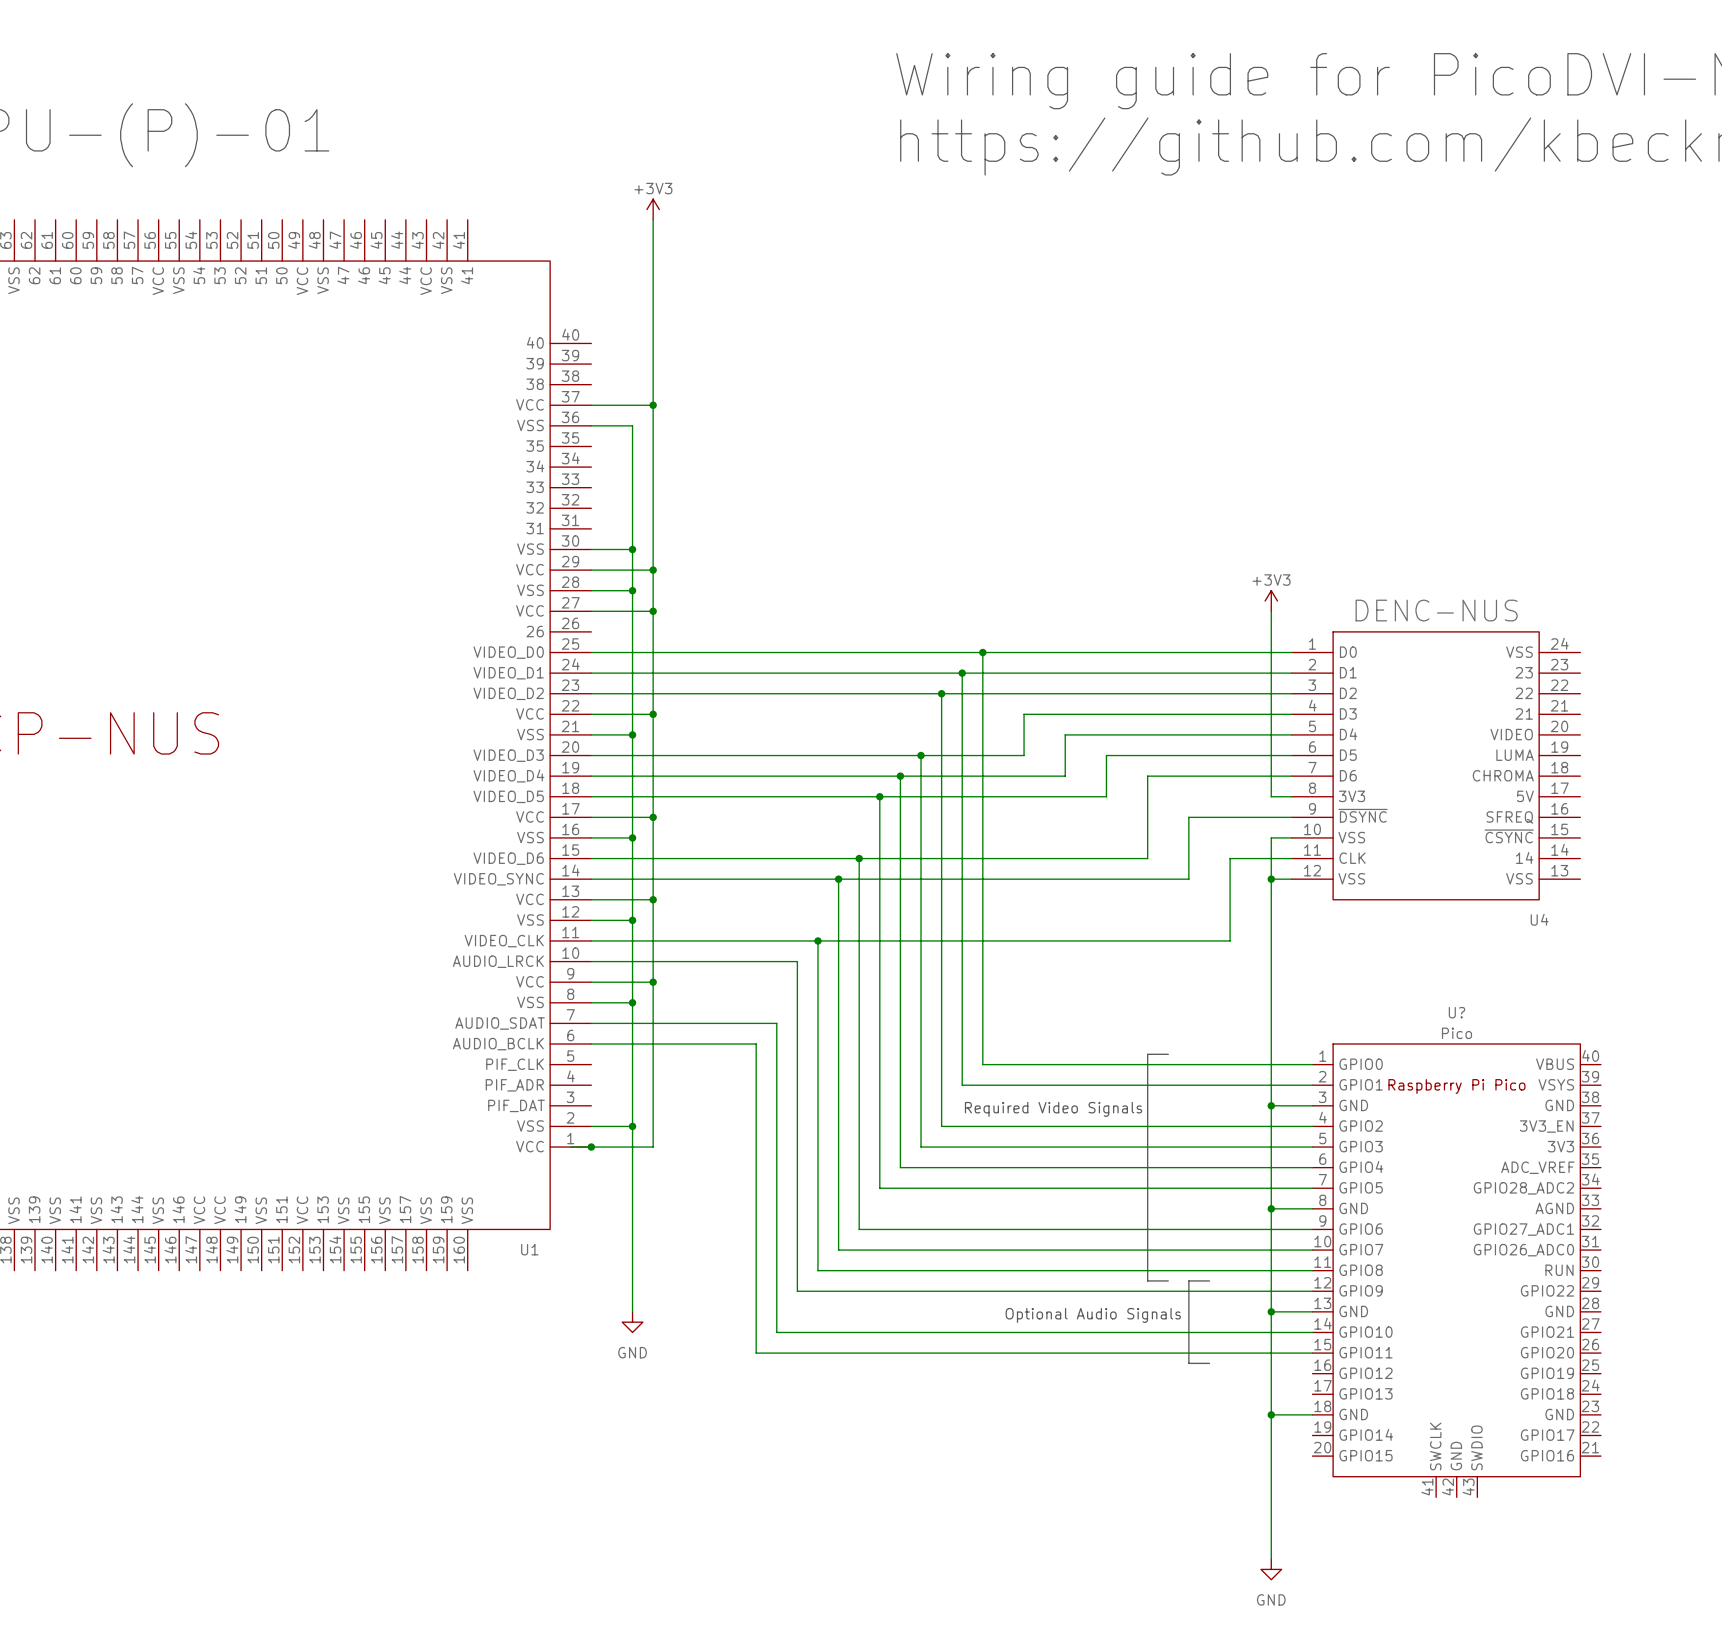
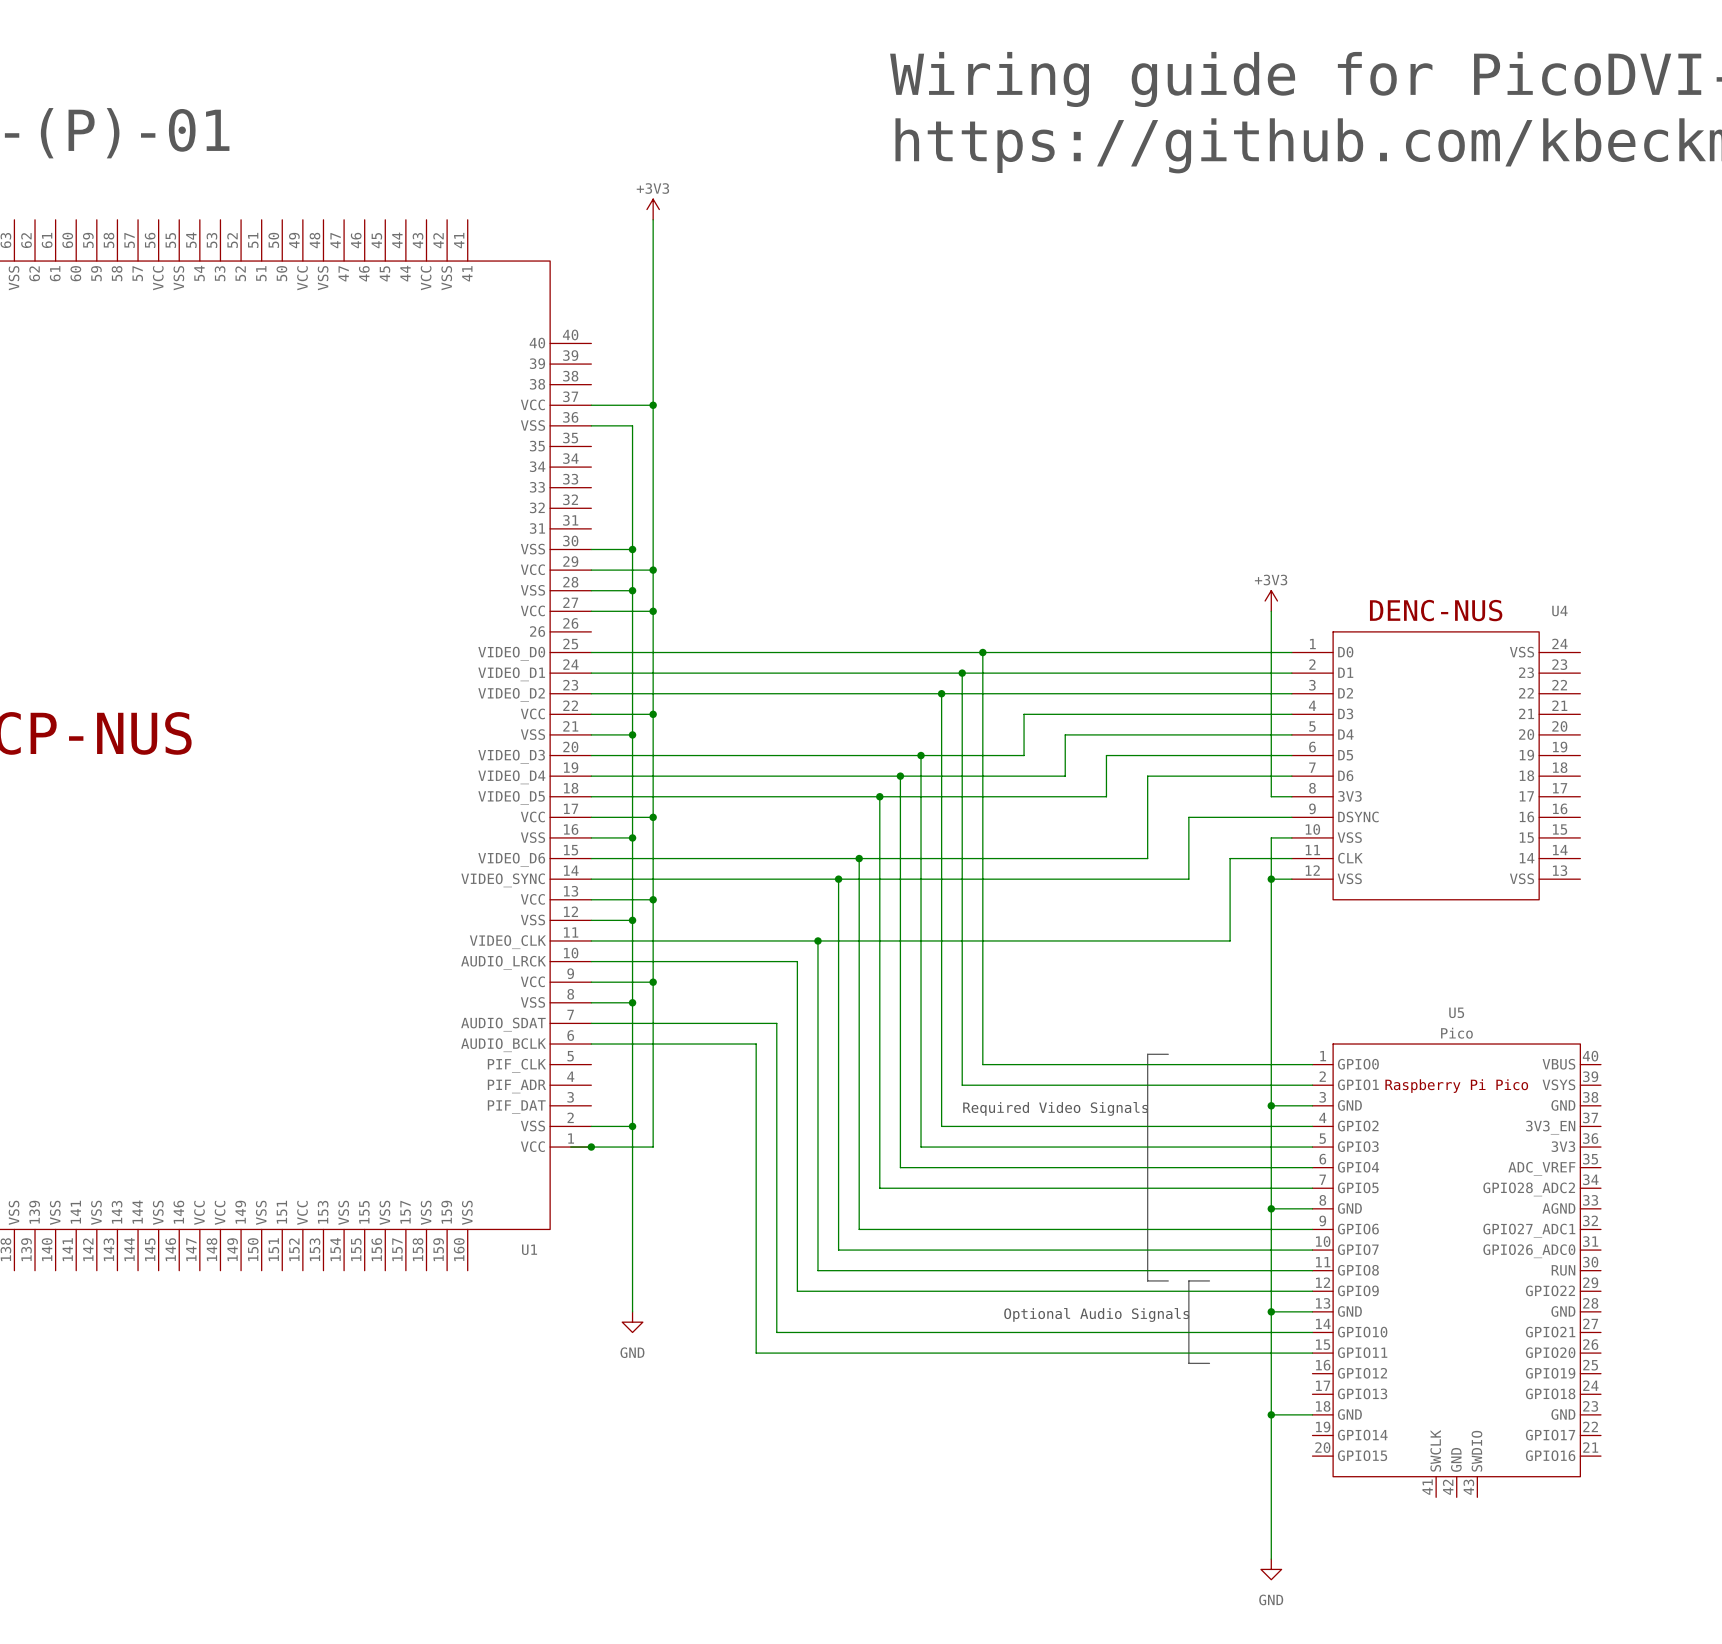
U4 text: none -> DENC-NUS (1436, 610)
U4 value: DENC-NUS (1436, 610) -> none
U4 pin name: VIDEO (1511, 734) -> 20 (1526, 734)
U4 pin name: LUMA (1515, 755) -> 19 (1526, 755)
U4 pin name: CHROMA (1503, 775) -> 18 (1526, 775)
U4 pin name: 5V (1525, 796) -> 17 (1526, 796)
U4 pin name: ~{DSYNC} (1363, 815) -> DSYNC (1358, 816)
U4 pin name: SFREQ (1509, 817) -> 16 (1526, 816)
U4 pin name: ~{CSYNC} (1509, 836) -> 15 (1526, 837)
U4 name position: U4 (1539, 919) -> U4 (1559, 611)
U? name: U? (1456, 1012) -> U5 (1456, 1012)

